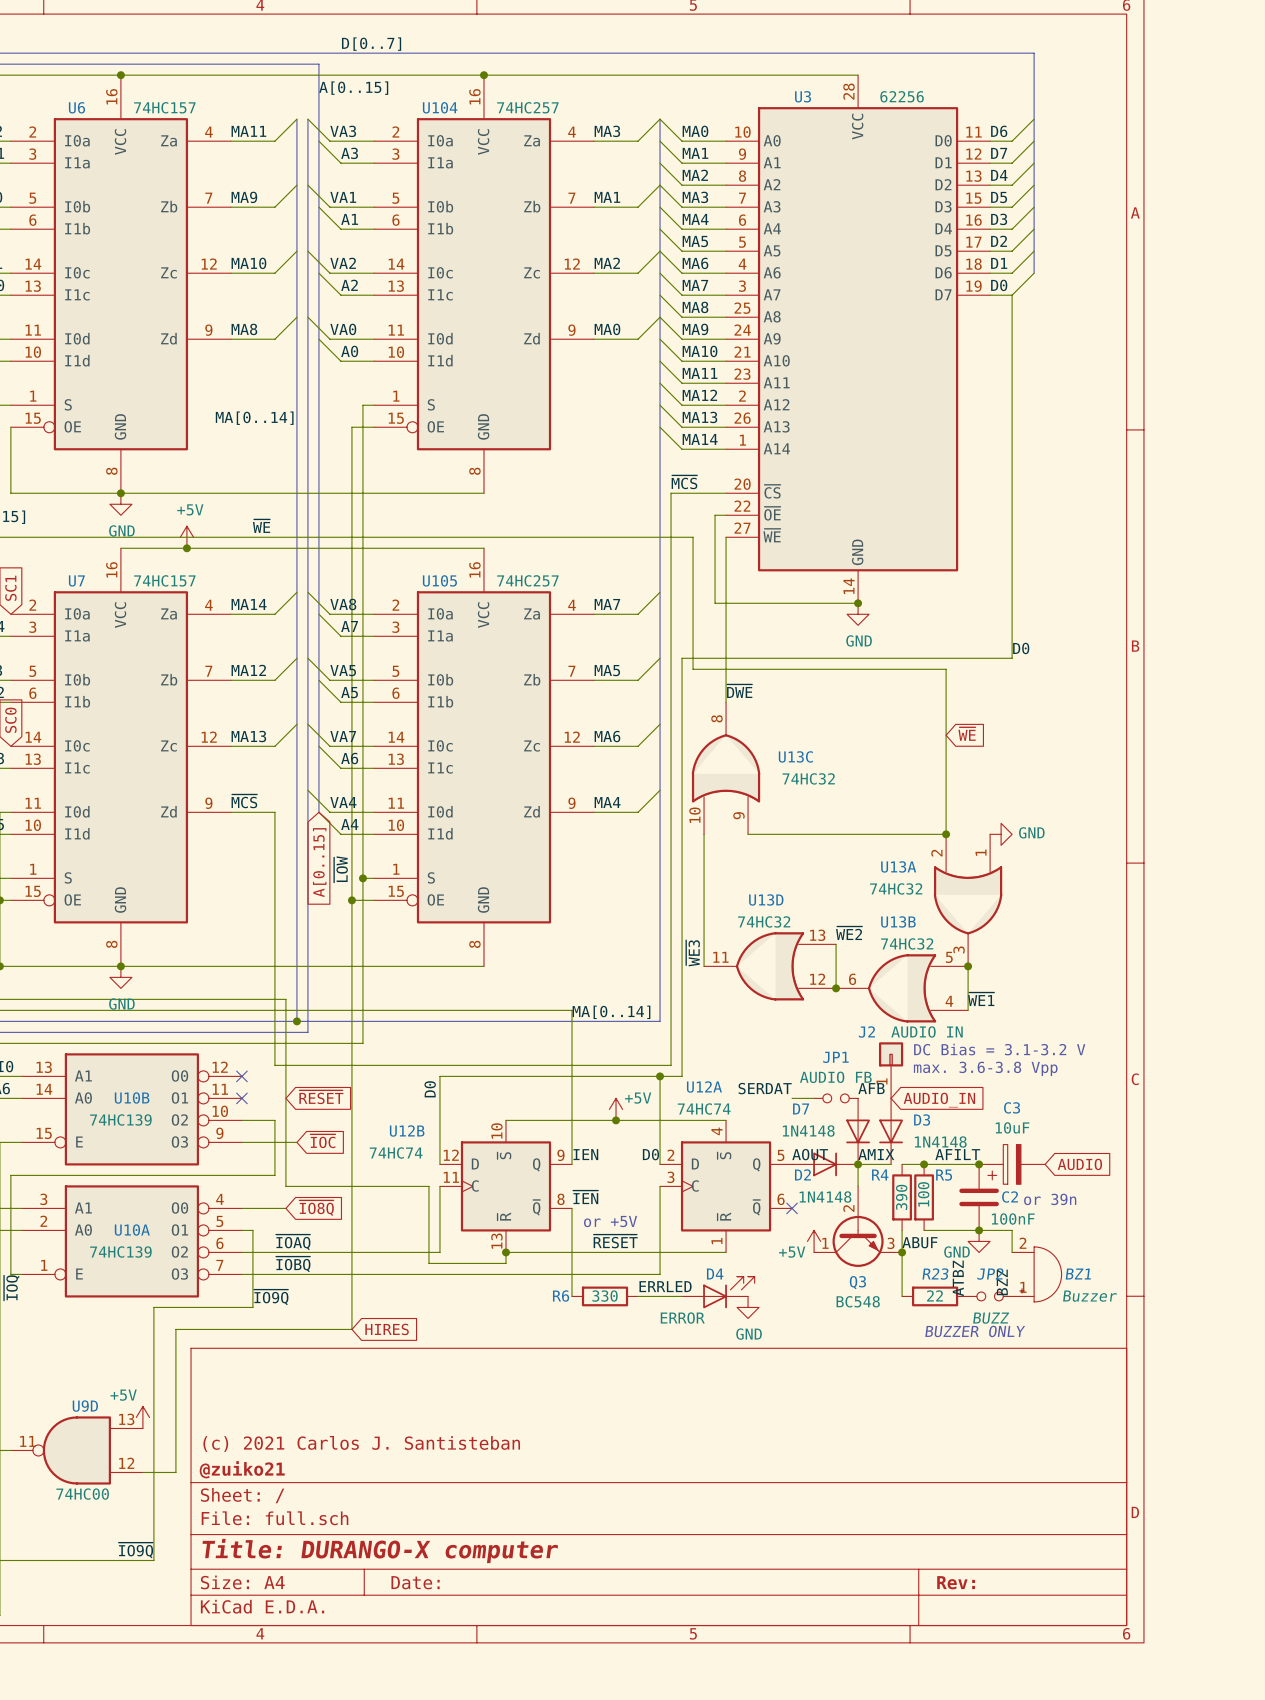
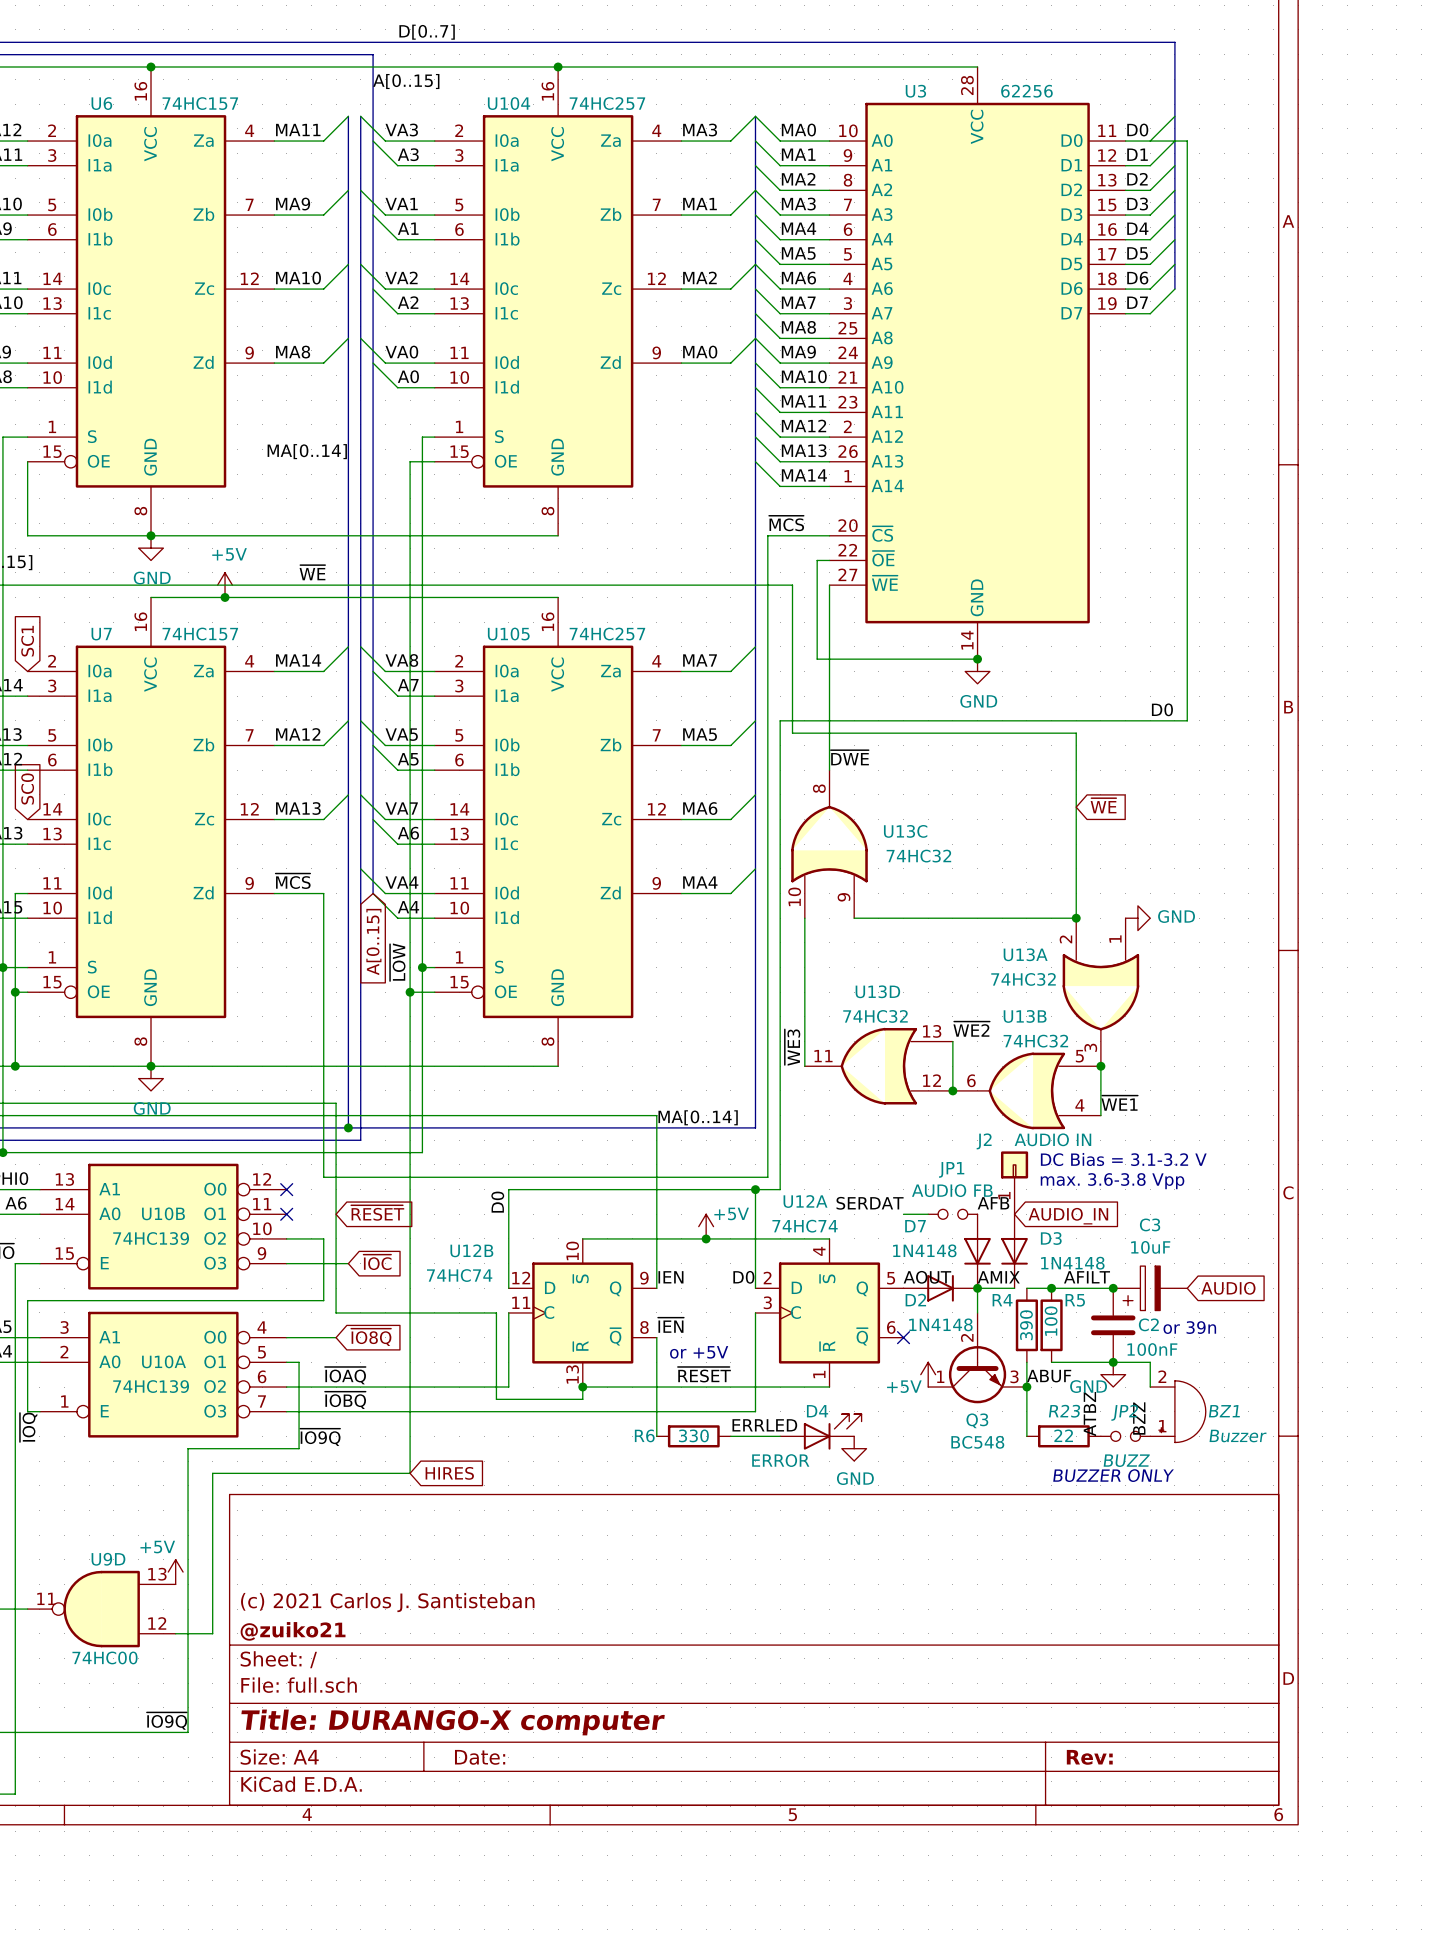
label: D6 (999, 131) -> D0 (1137, 130)
label: D7 (999, 153) -> D1 (1137, 154)
label: D4 (999, 175) -> D2 (1137, 179)
label: D5 (999, 197) -> D3 (1137, 204)
label: D3 (999, 219) -> D4 (1137, 228)
label: D2 (999, 241) -> D5 (1137, 253)
label: D1 (999, 263) -> D6 (1137, 278)
label: D0 (999, 285) -> D7 (1137, 302)
wire: (1012, 295) (1012, 658) -> (1150, 141) (1187, 141) (1187, 720) (1150, 720)

